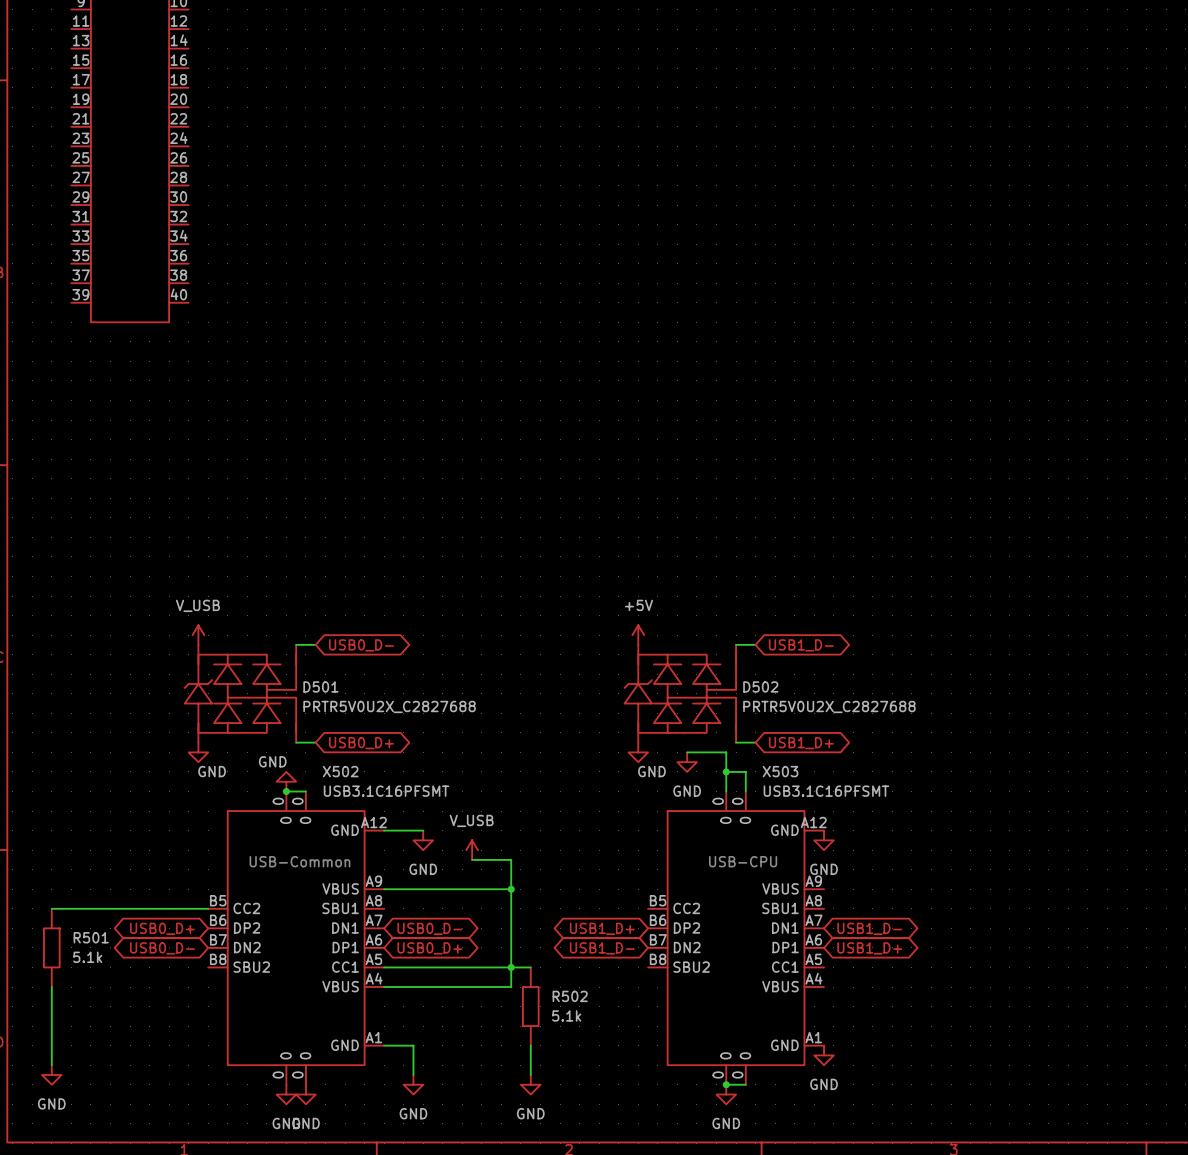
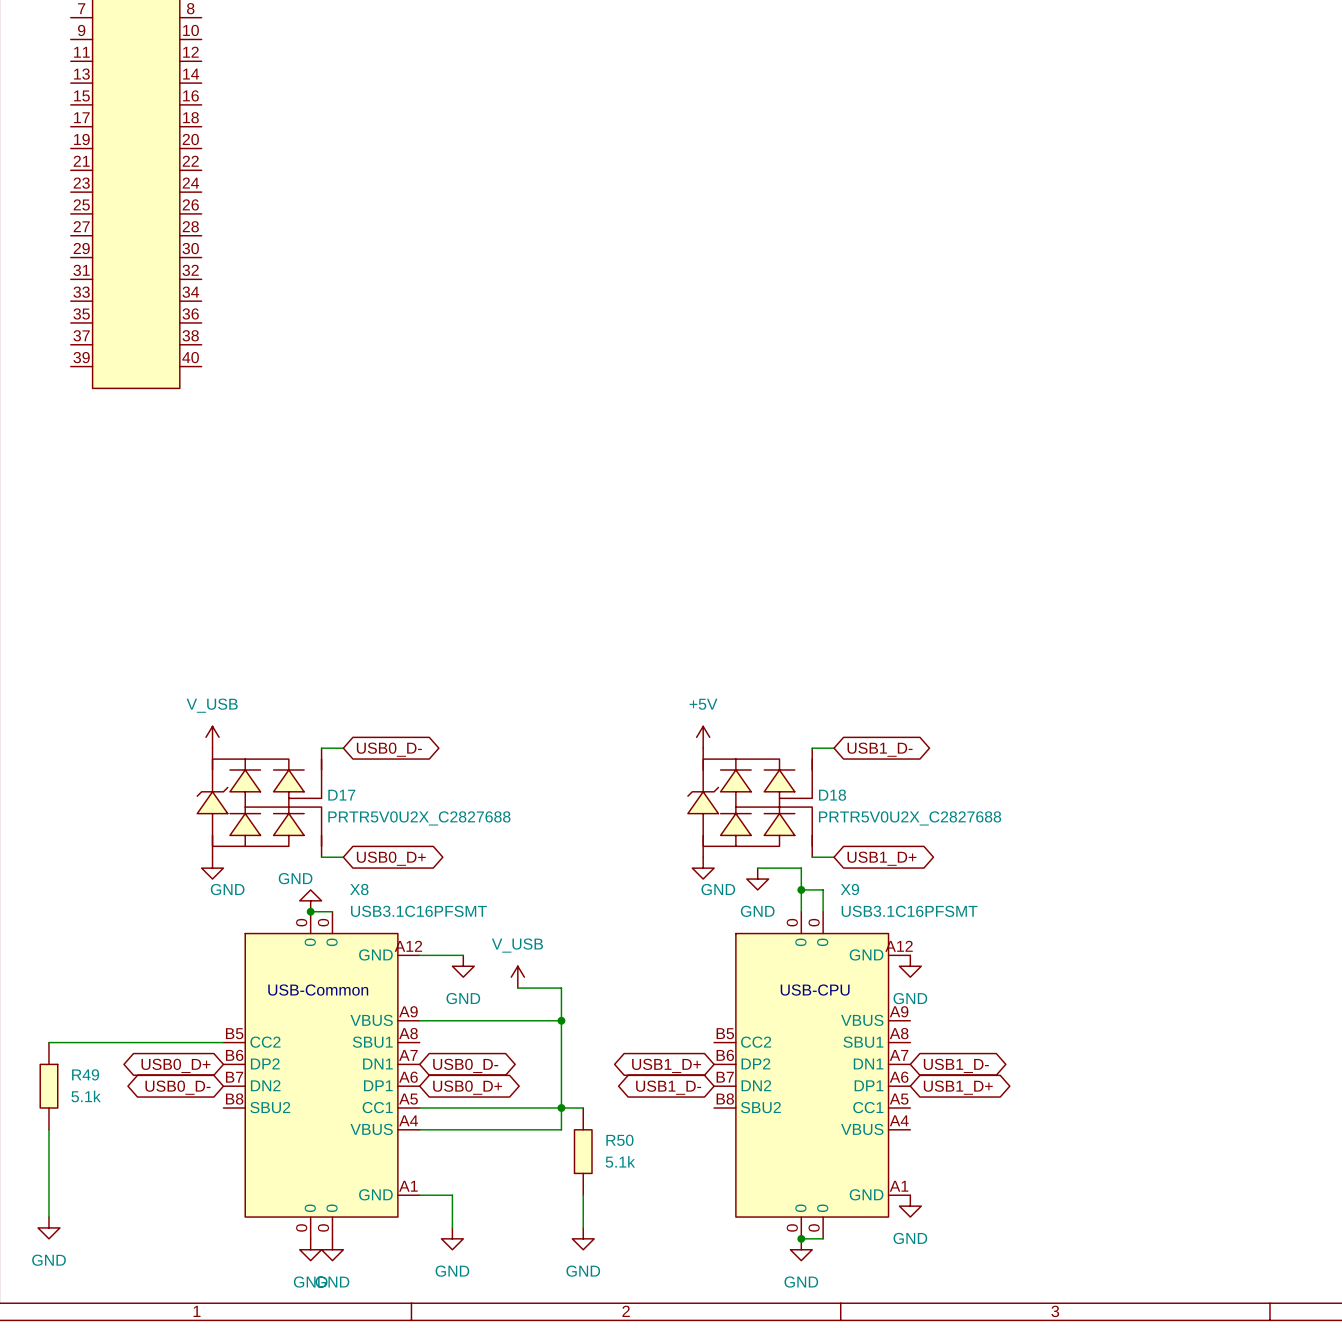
D501 name: D501 (320, 686) -> D17 (341, 795)
D502 name: D502 (760, 686) -> D18 (832, 795)
X502 name: X502 (340, 771) -> X8 (359, 889)
X503 name: X503 (780, 771) -> X9 (849, 889)
R501 name: R501 (91, 937) -> R49 (85, 1074)
R502 name: R502 (570, 996) -> R50 (619, 1140)

